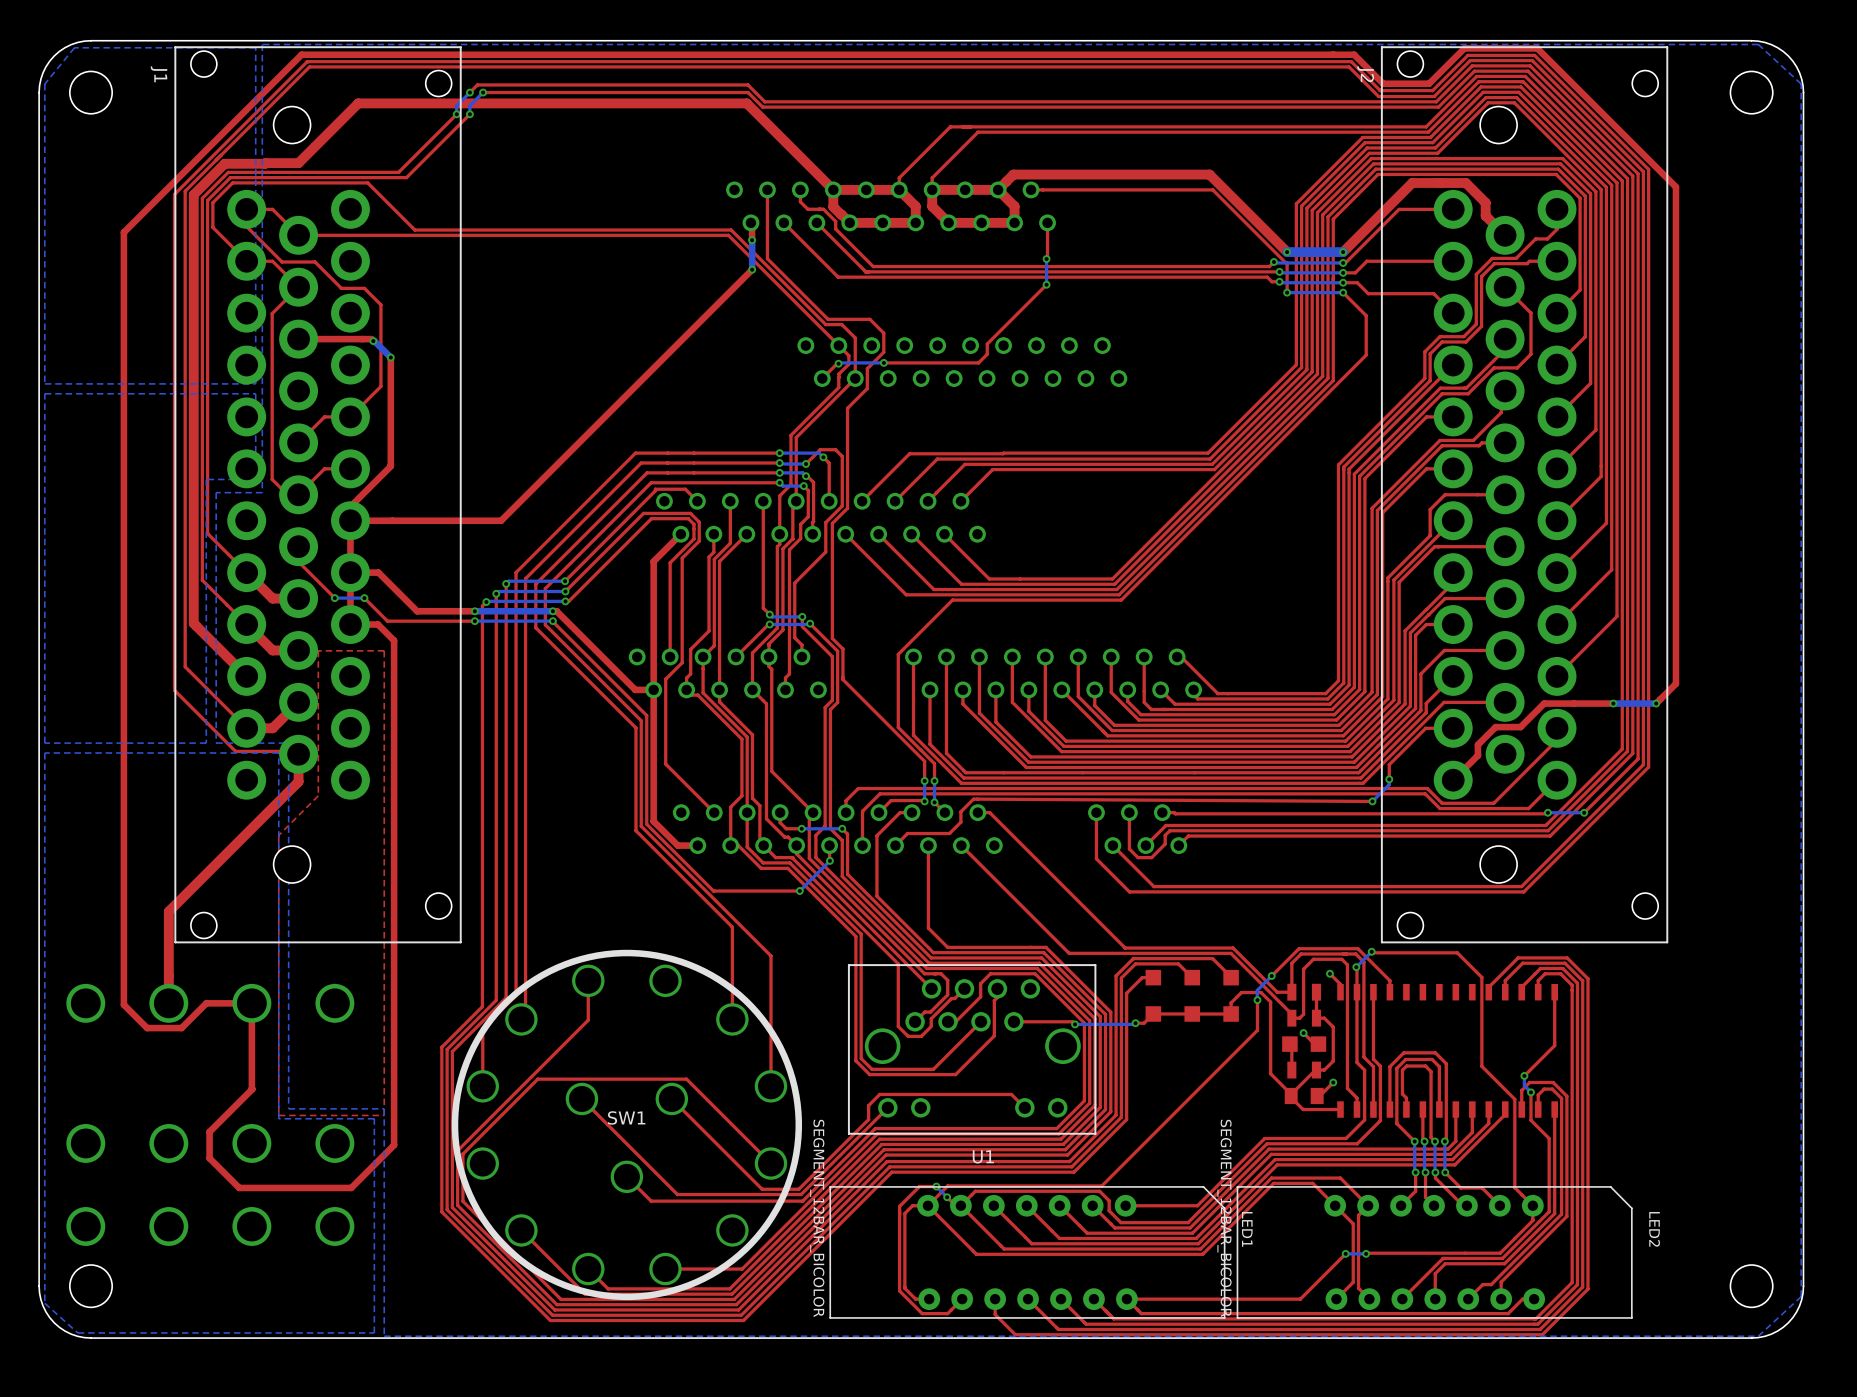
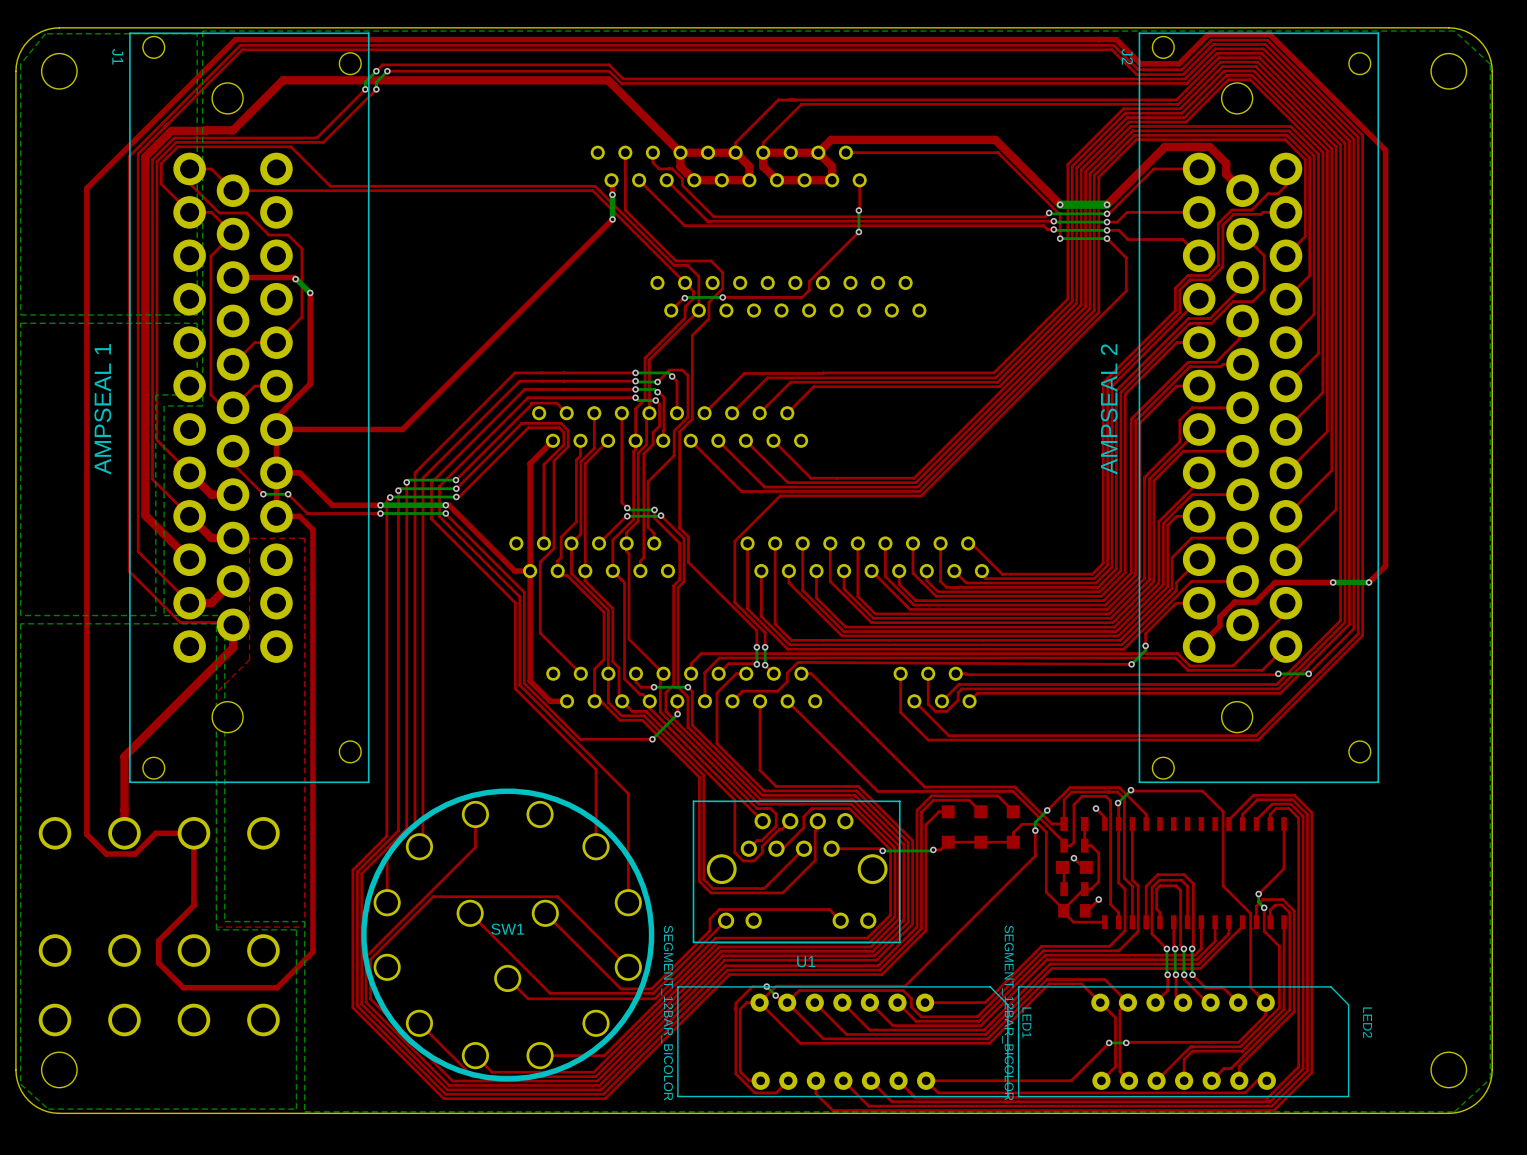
text: none -> AMPSEAL 1 (102, 409)
text: none -> AMPSEAL 2 (1109, 409)

